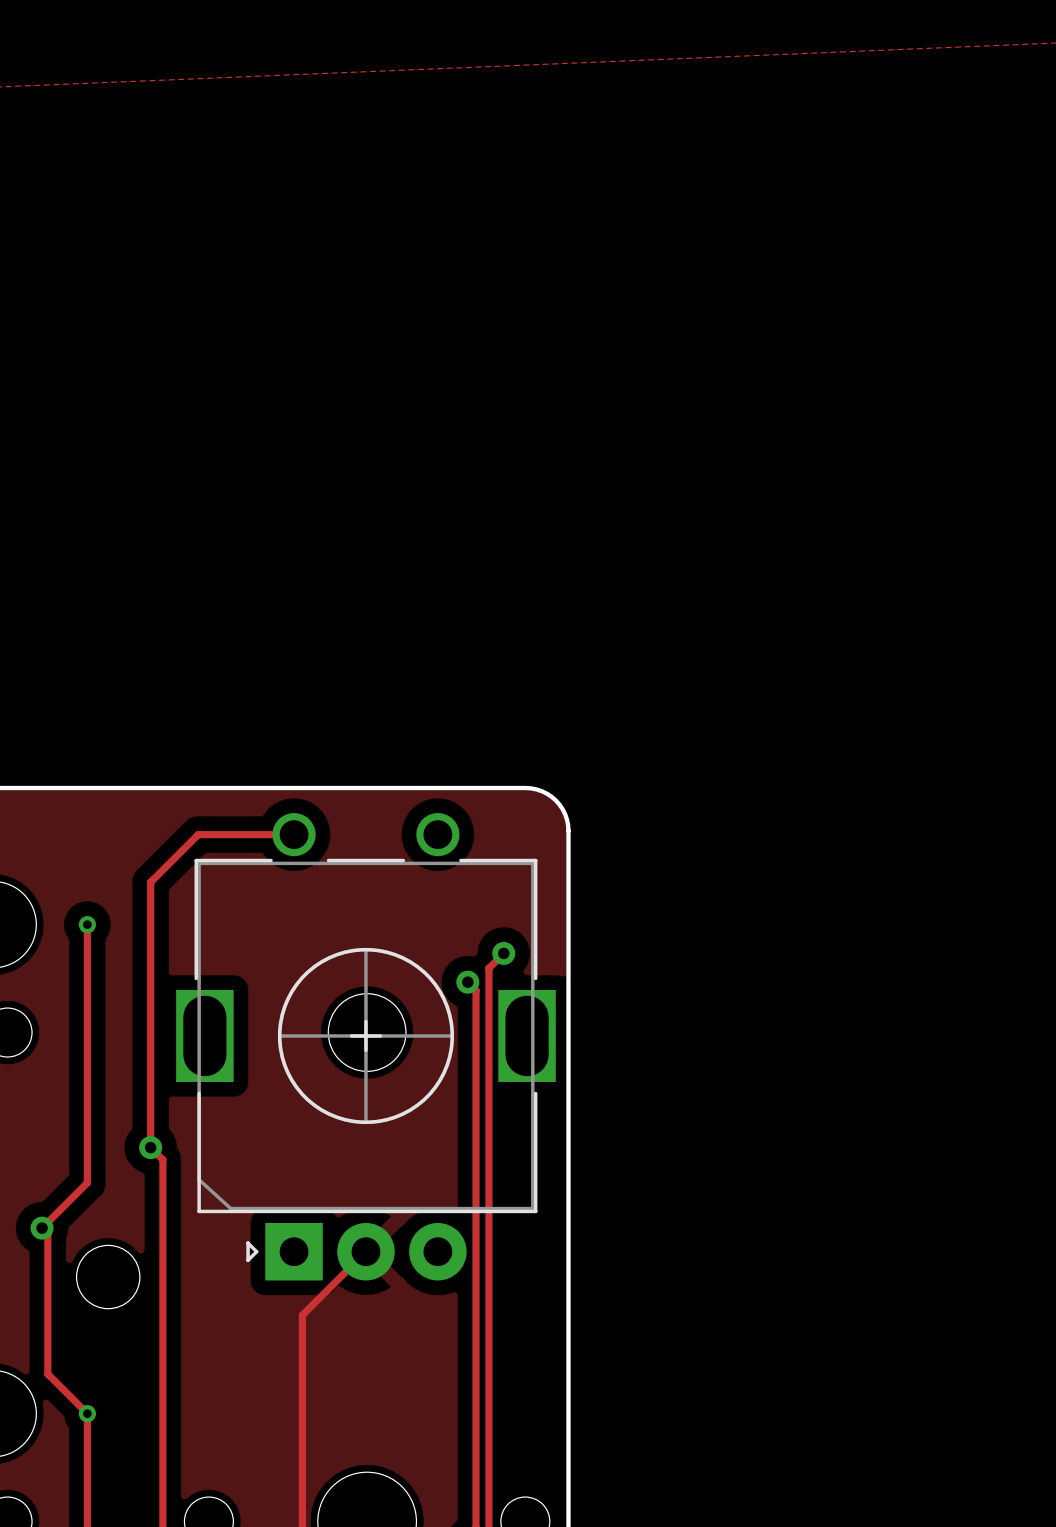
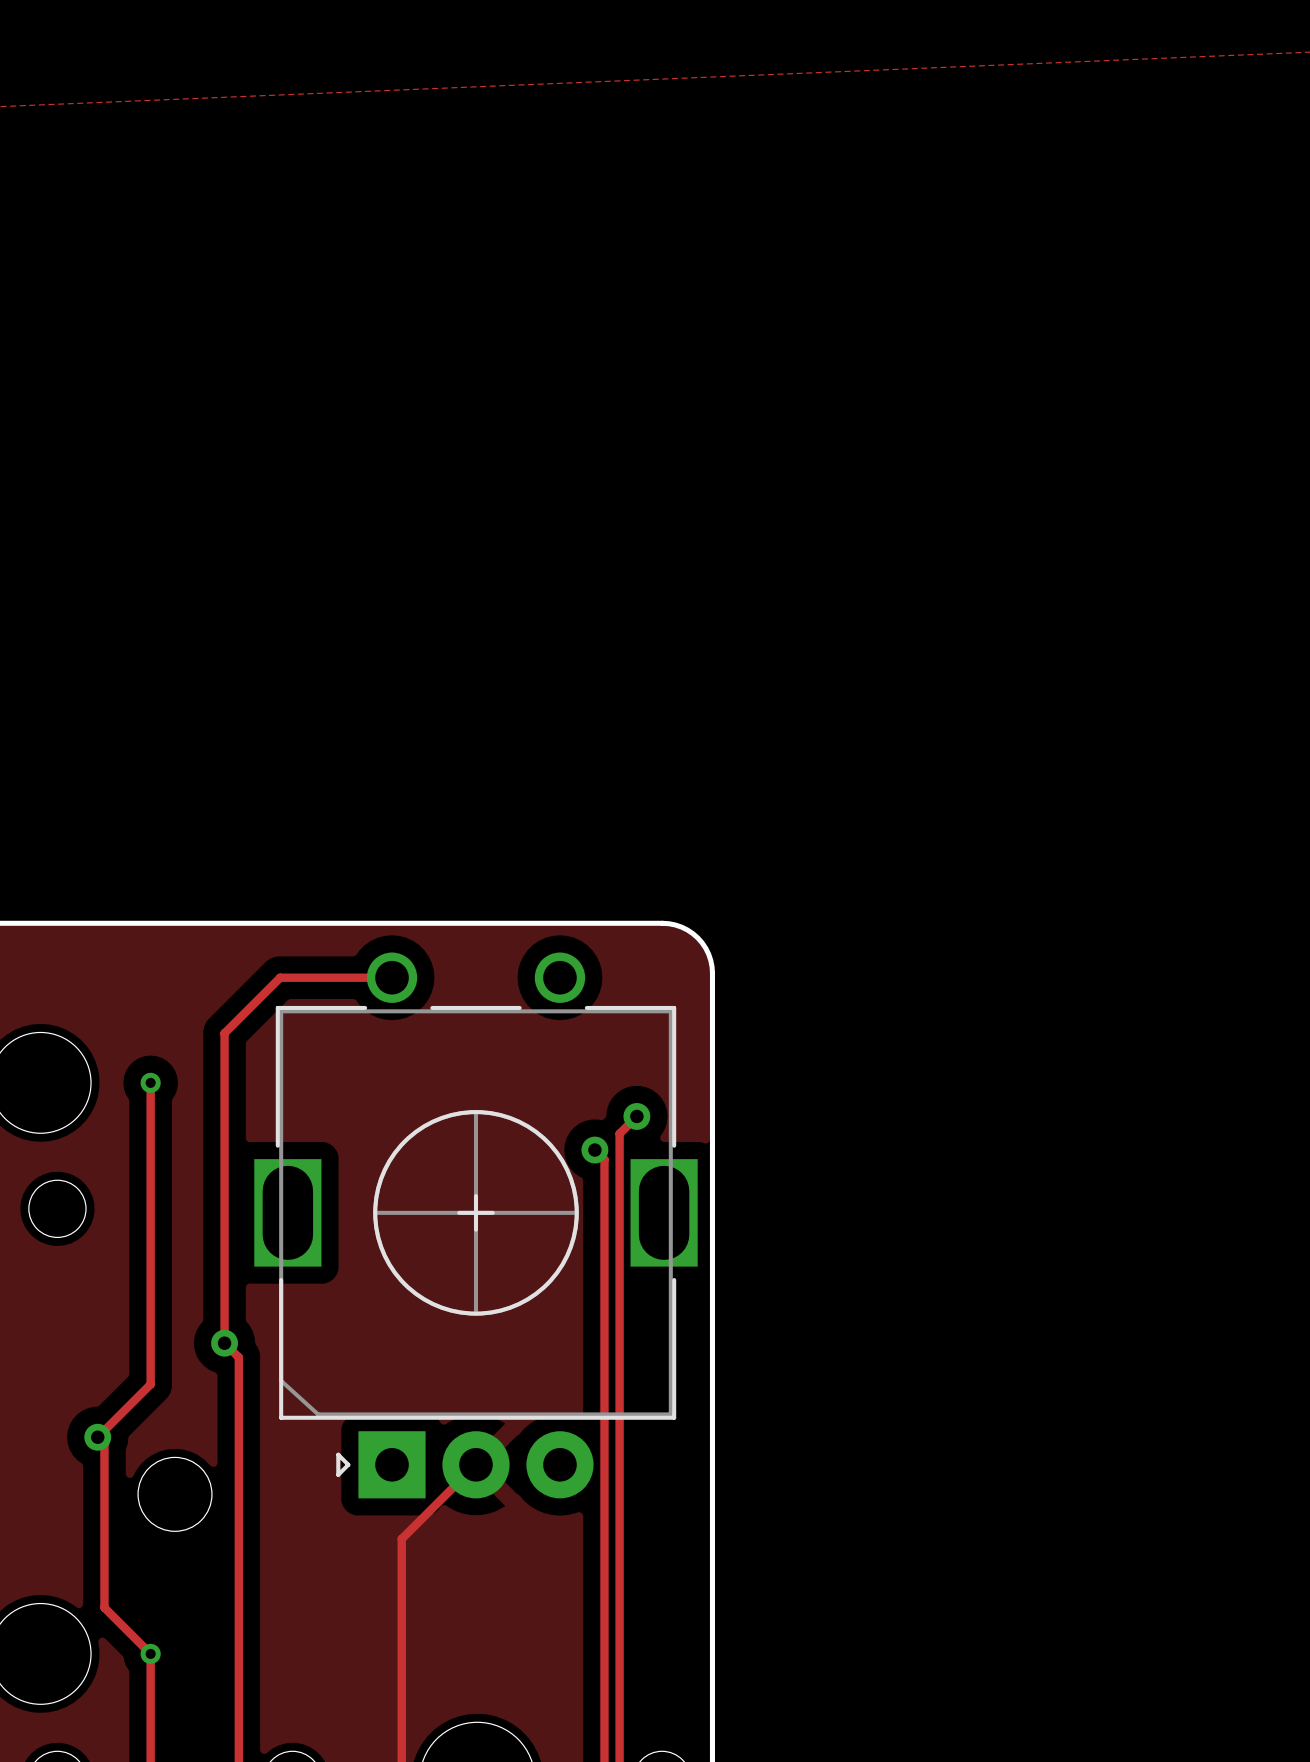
part footprint: [176, 813, 556, 1281] -> [254, 952, 698, 1499]

